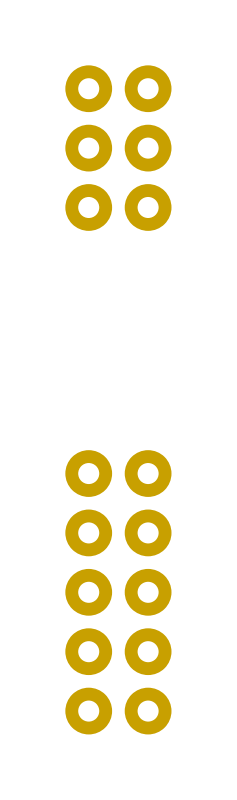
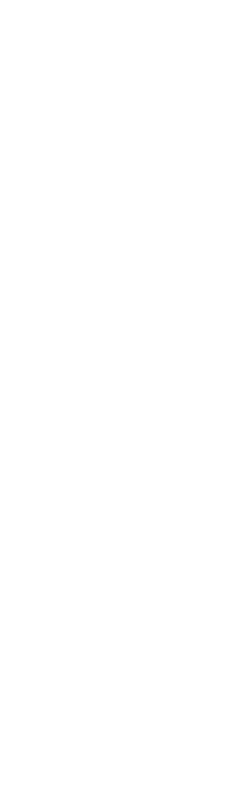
part: (118, 148) -> none
part: (118, 592) -> none

